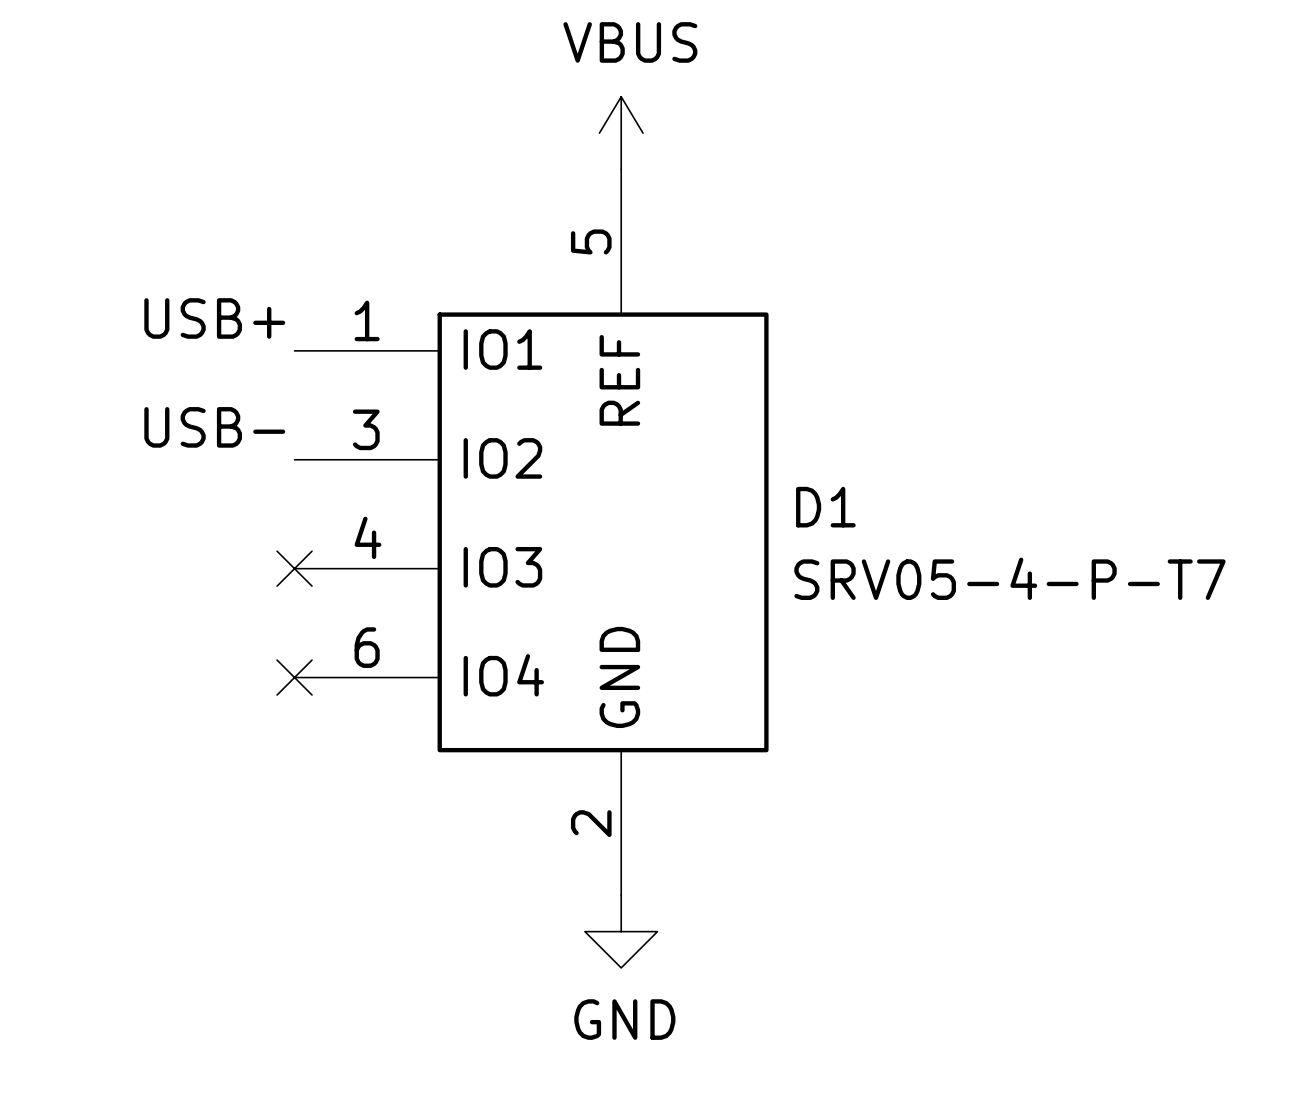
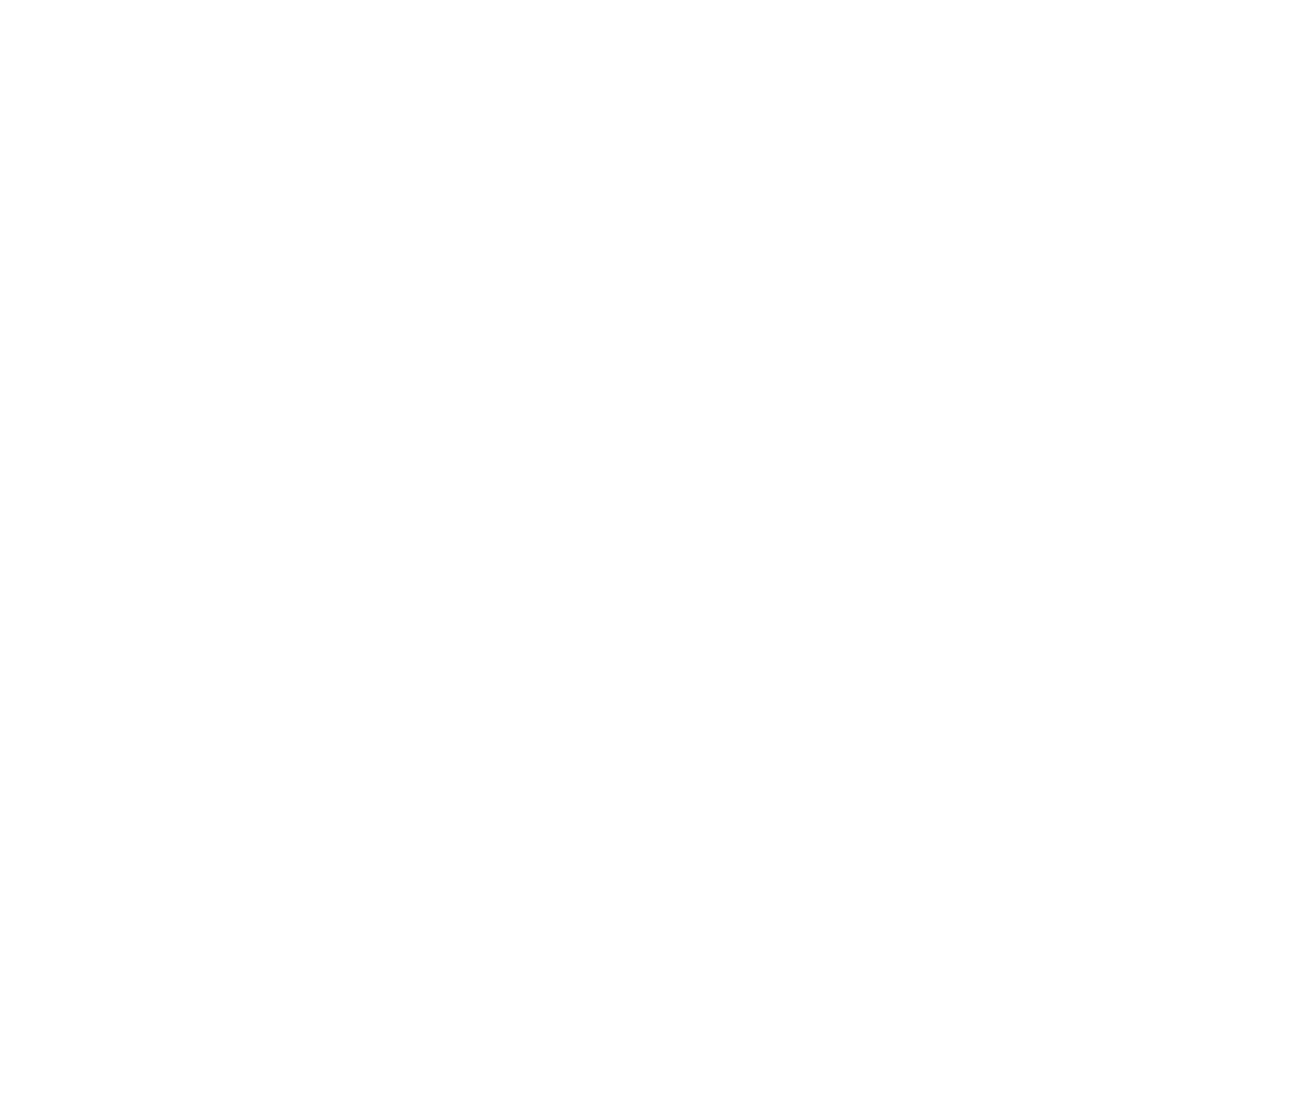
power symbol: VBUS (621, 133) -> none
label: USB+ (214, 318) -> none
label: USB- (214, 427) -> none
D1: SRV05-4-P-T7 (531, 532) -> none
no-connect mark: (294, 568) -> none
no-connect mark: (294, 677) -> none
power symbol: GND (621, 931) -> none

